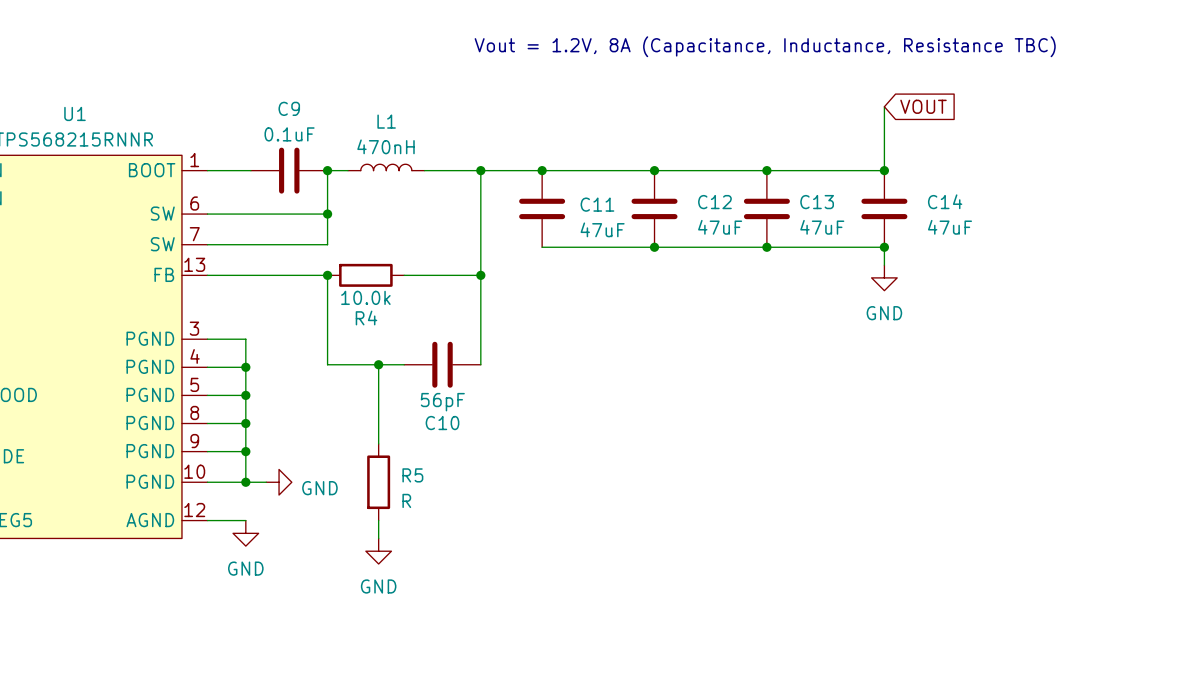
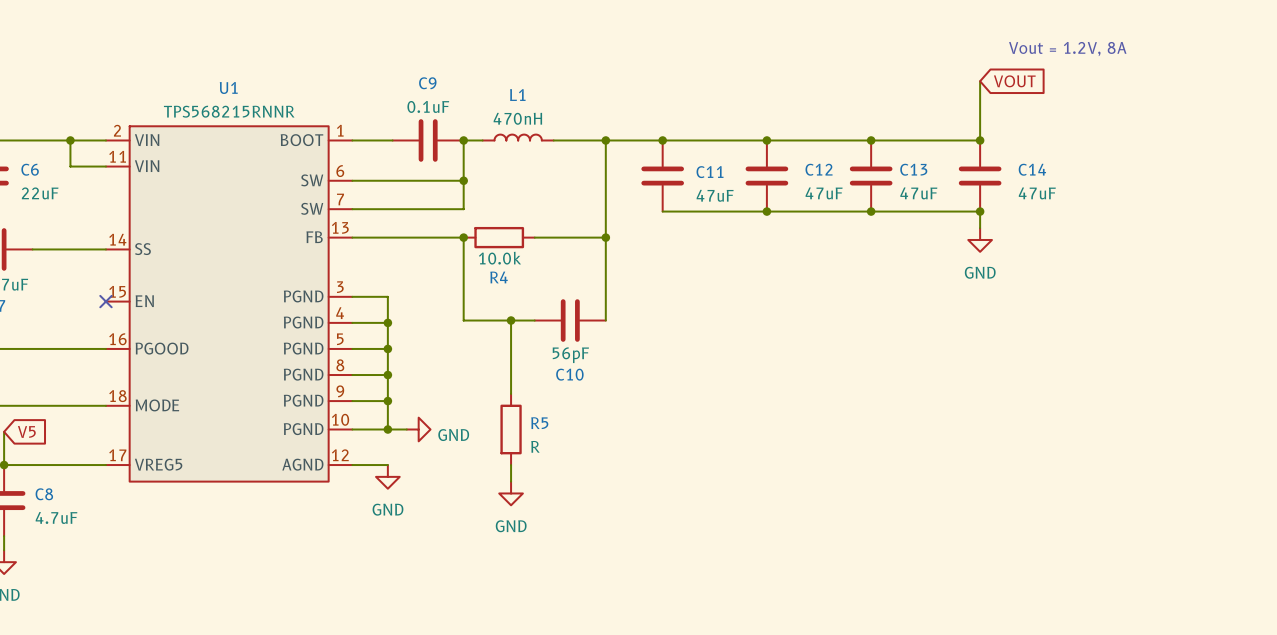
text: Vout = 1.2V, 8A (Capacitance, Inductance, Resistance TBC) (765, 46) -> none
text: none -> Vout = 1.2V, 8A (1067, 49)

